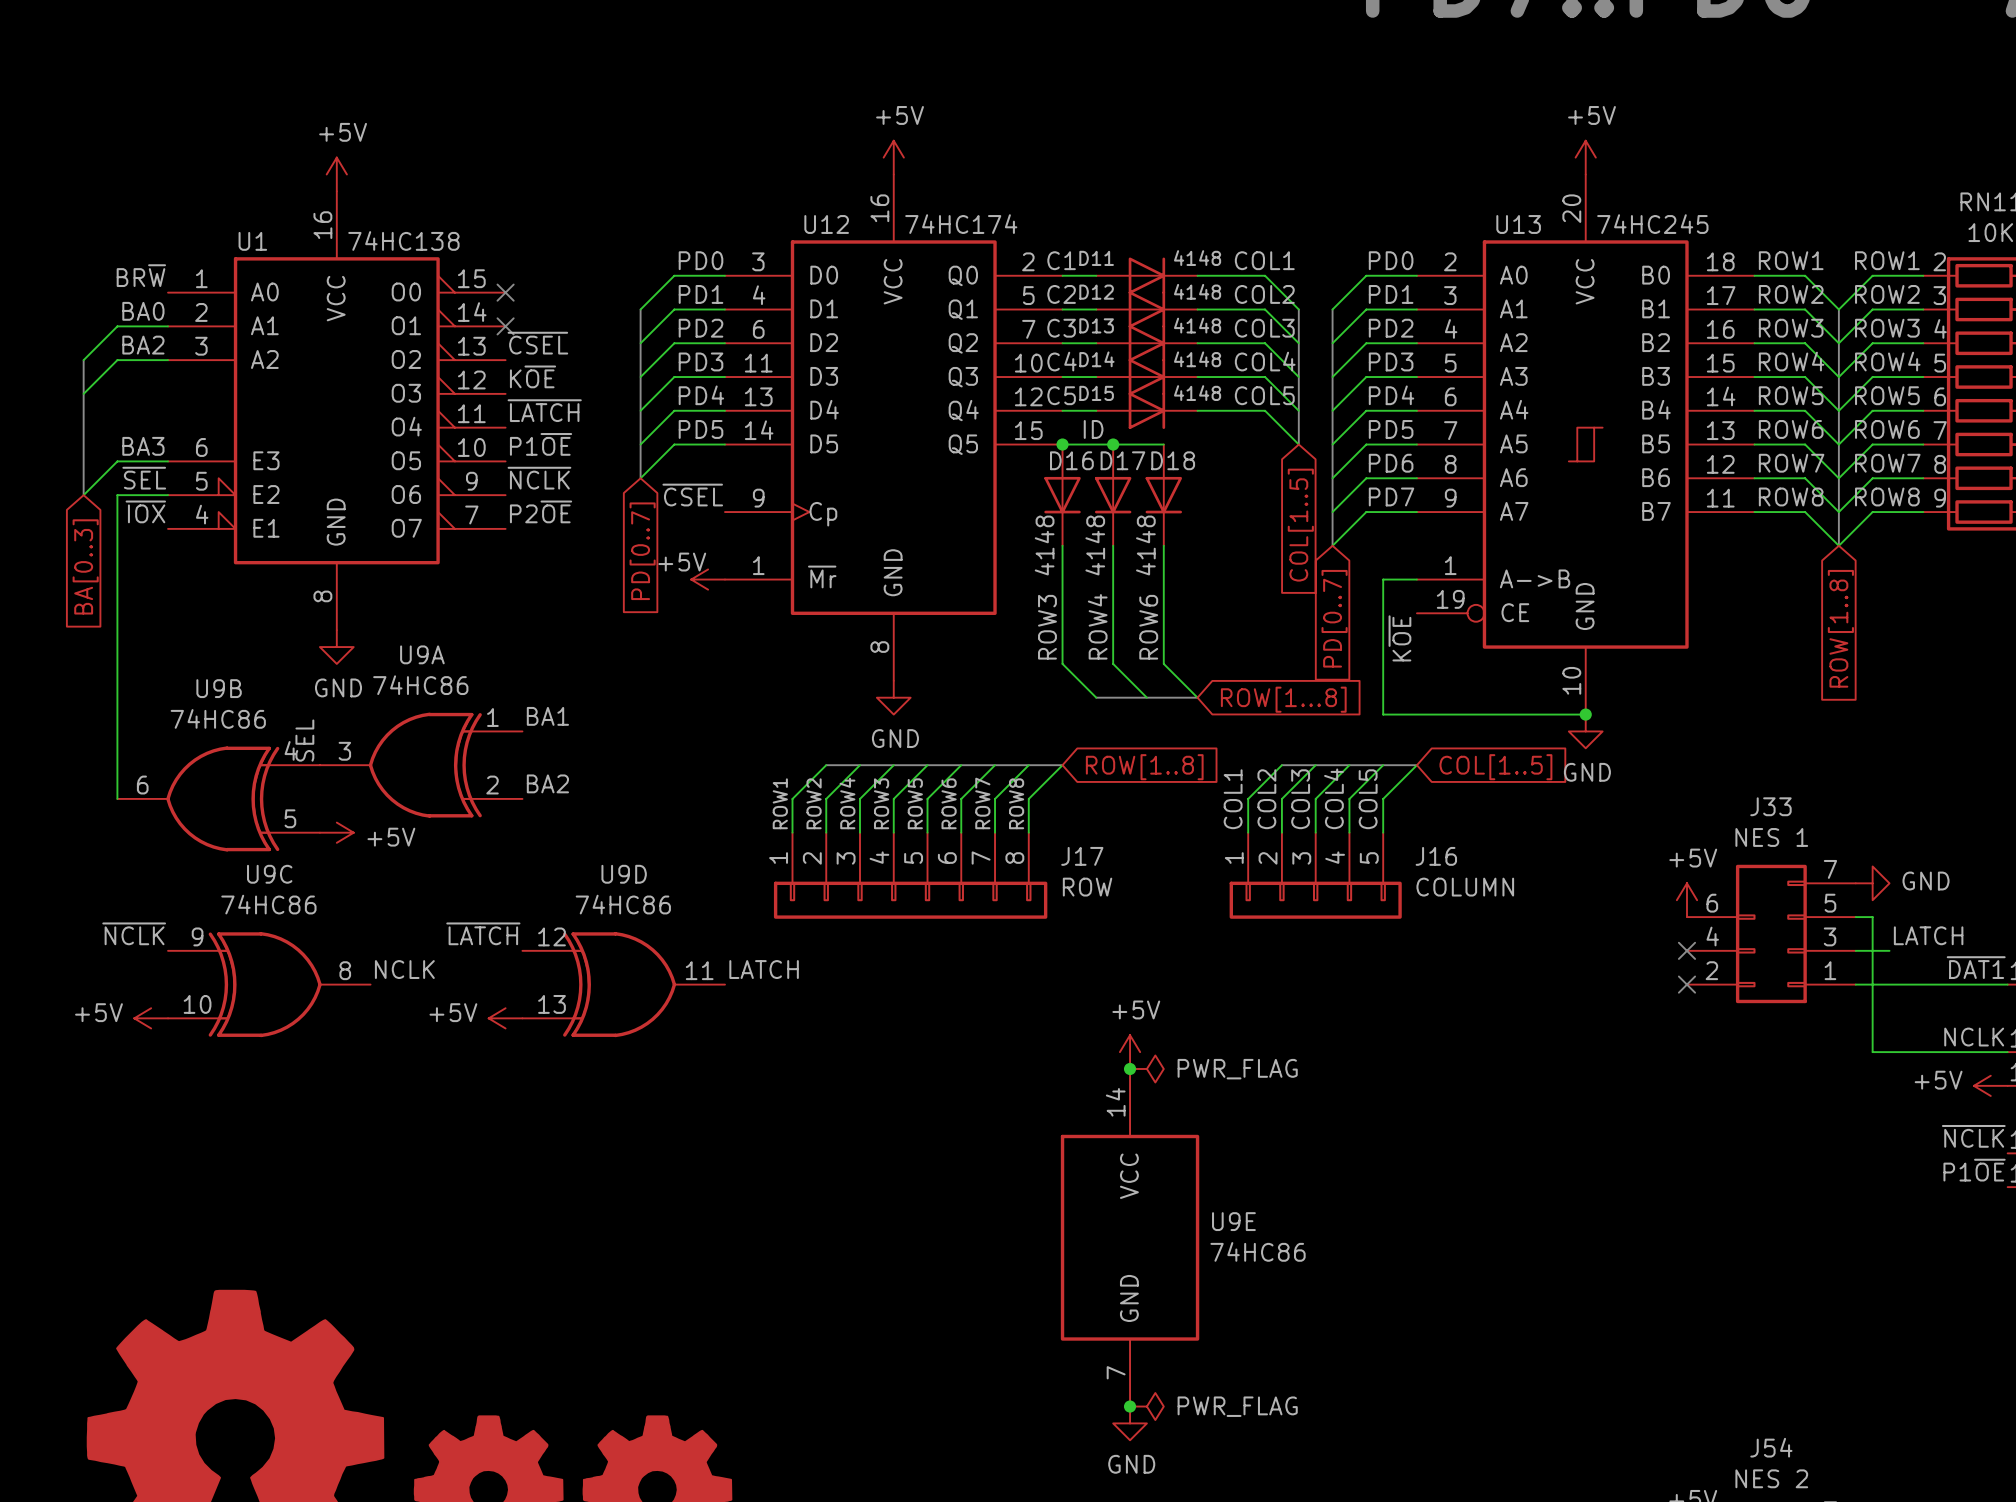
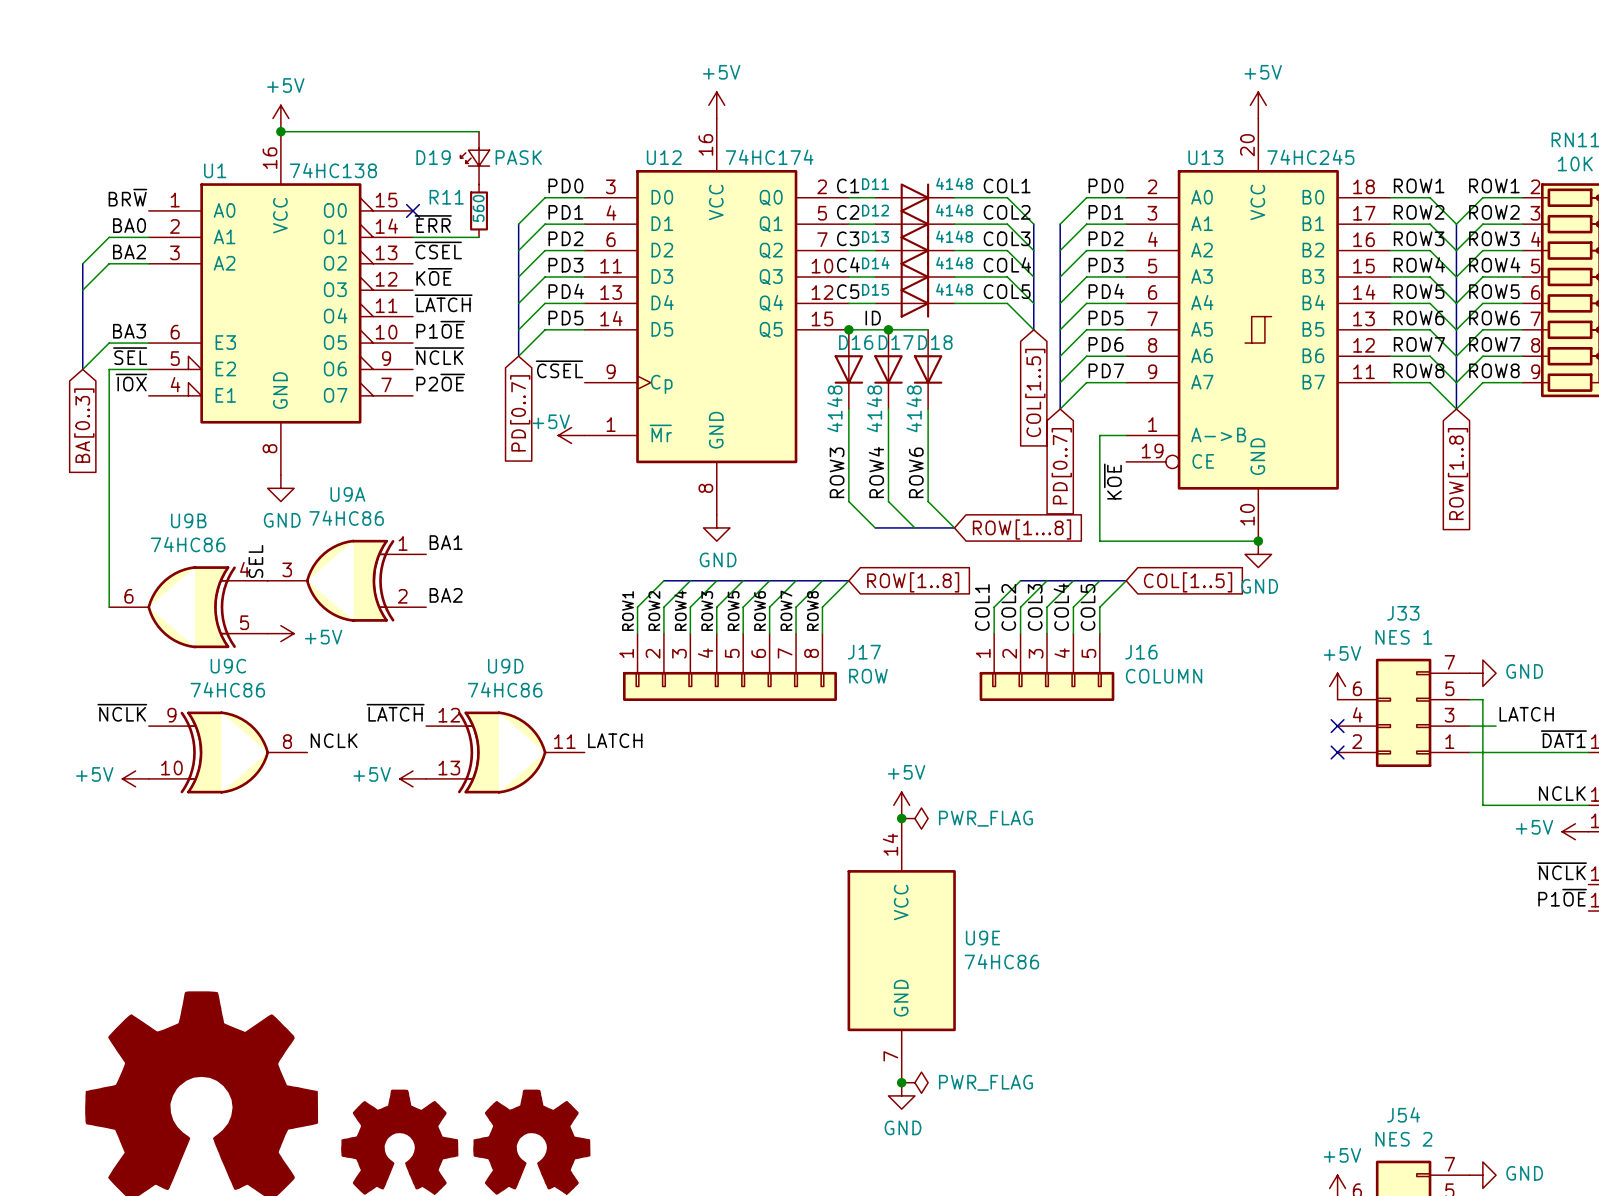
wire: none -> (280, 131) (479, 131)
junction: none -> (280, 131)
D19: none -> PASK (475, 158)
R11: none -> 560 (479, 210)
label: none -> ~{ERR} (433, 224)
wire: none -> (412, 237) (479, 237)
no-connect mark: (505, 326) -> none

